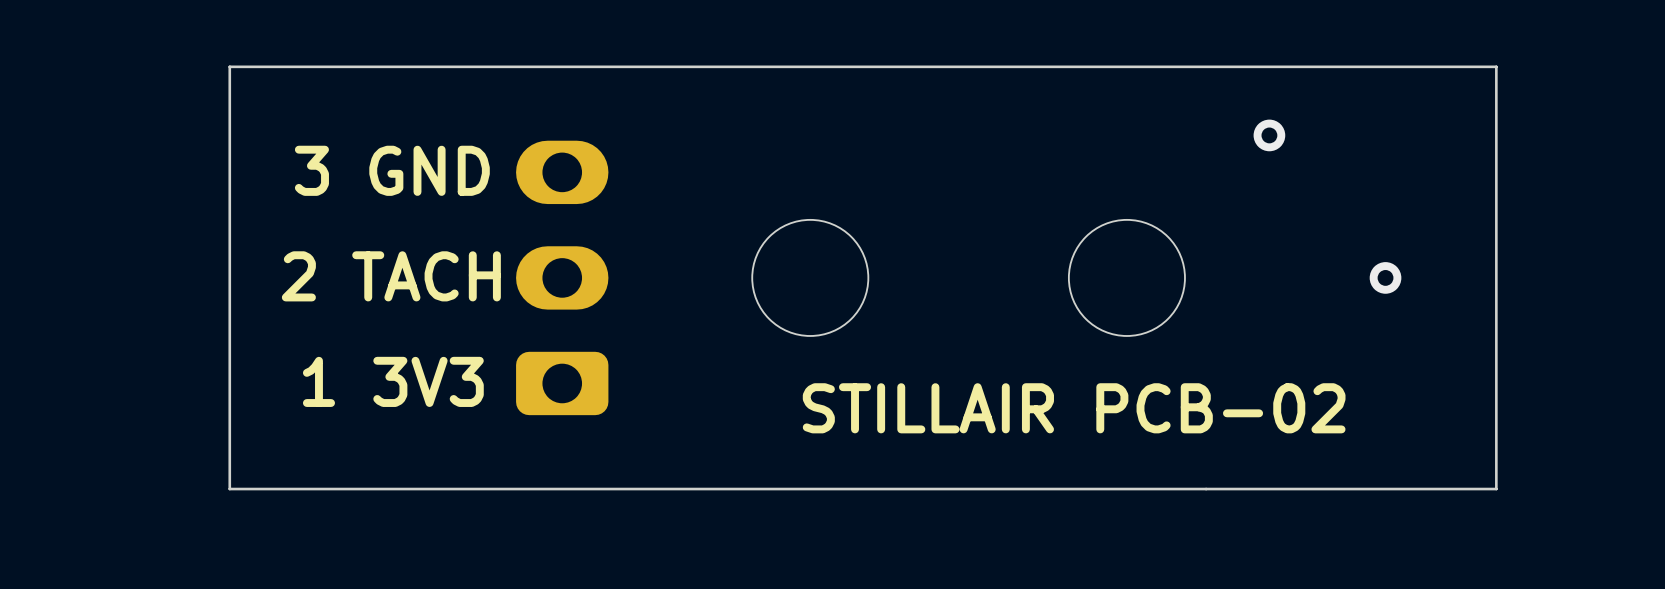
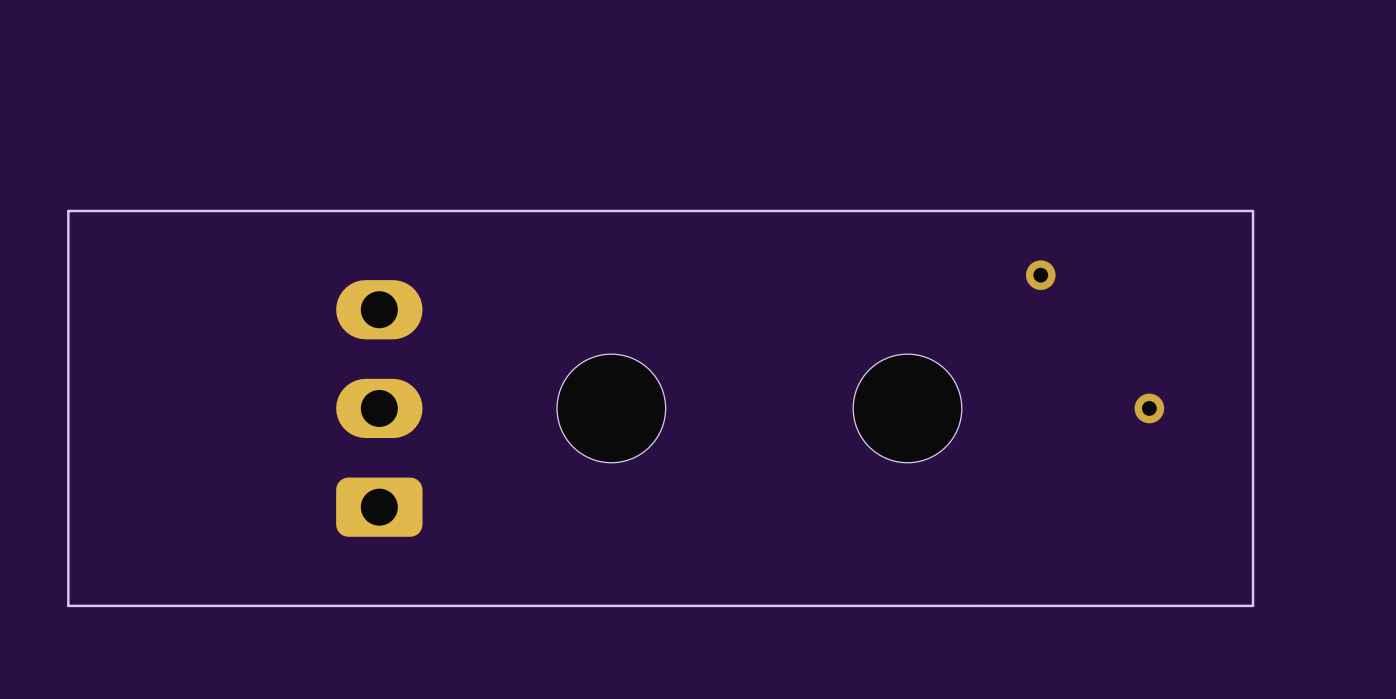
text: 3 GND (392, 170) -> none
text: 2 TACH (391, 276) -> none
text: 1 3V3 (393, 381) -> none
text: STILLAIR PCB-02 (1074, 408) -> none

